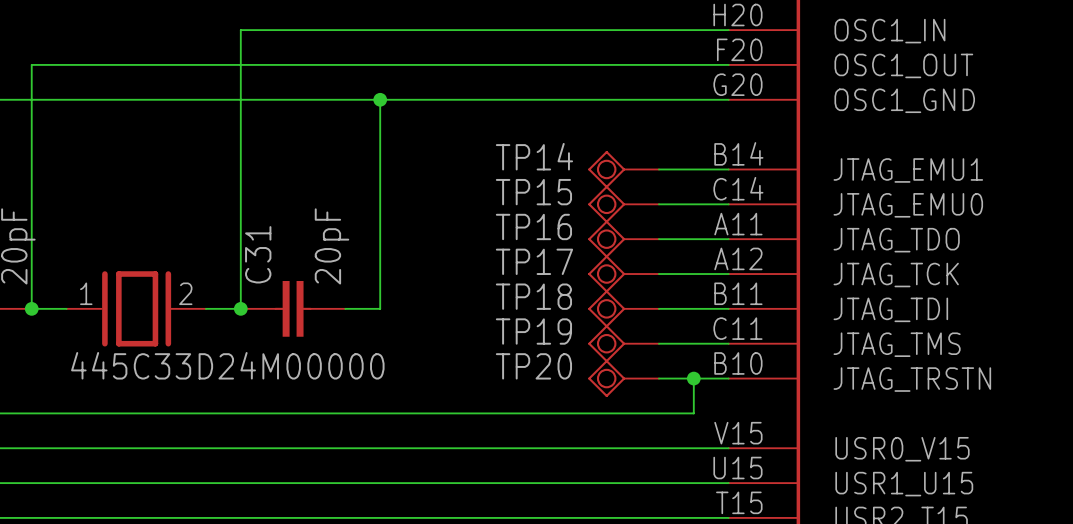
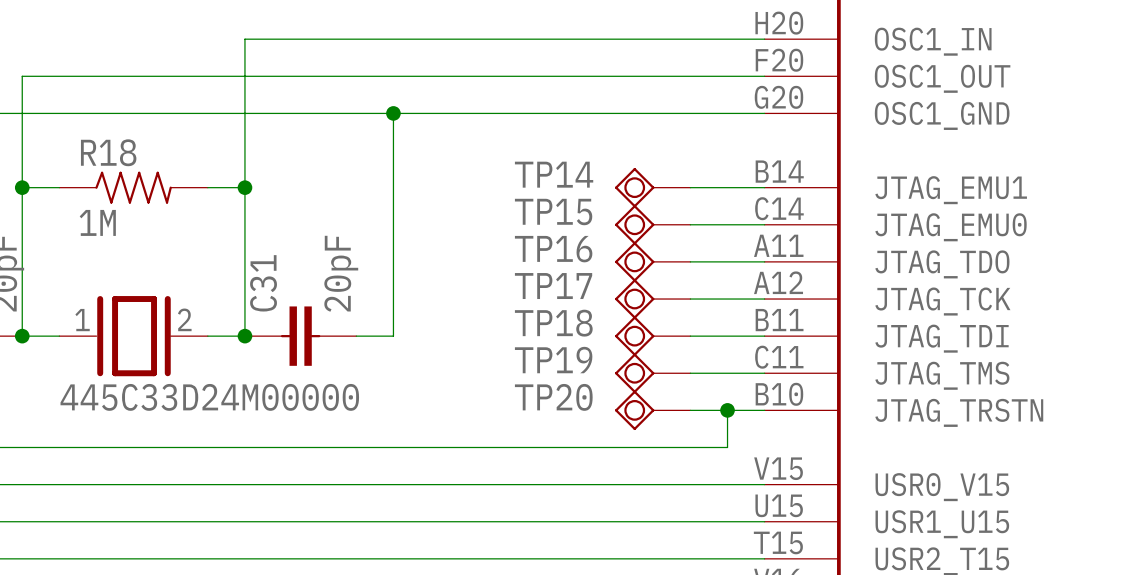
wire: none -> (22, 187) (59, 187)
junction: none -> (22, 187)
R18: none -> 1M (133, 187)
wire: none -> (207, 187) (244, 187)
junction: none -> (244, 187)

